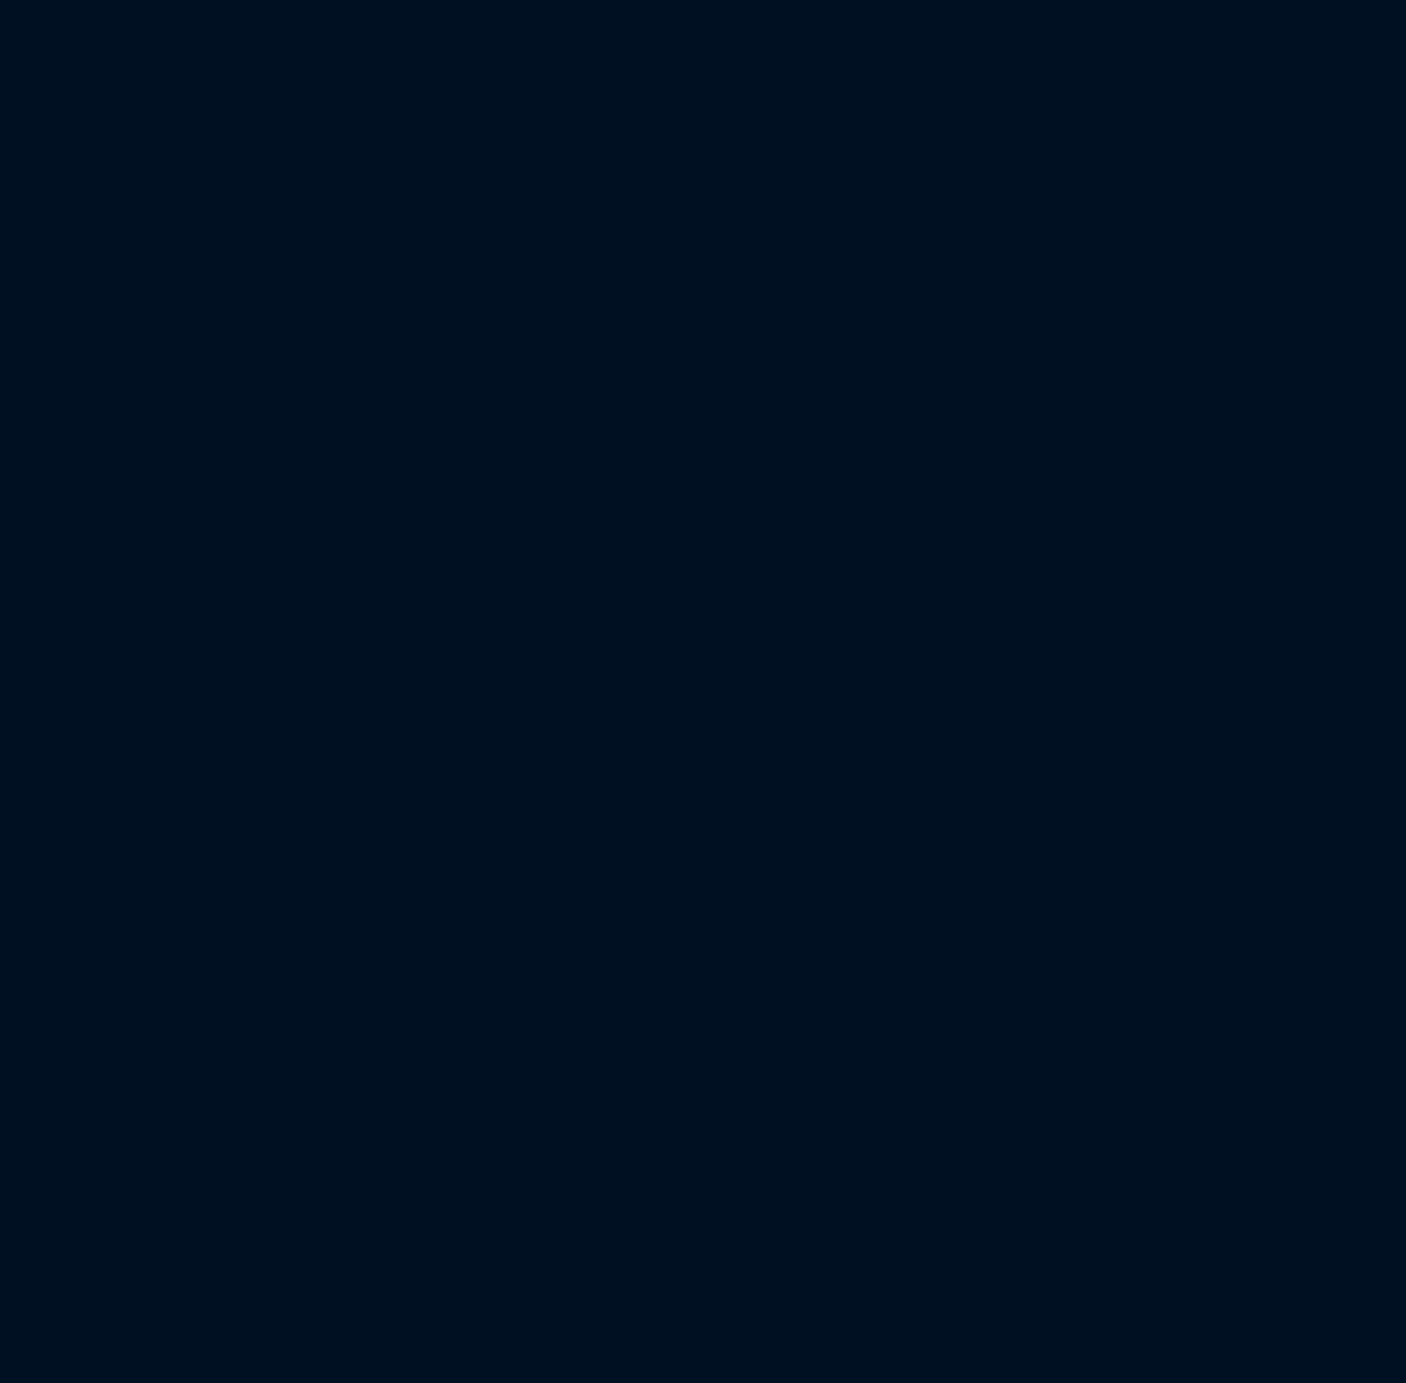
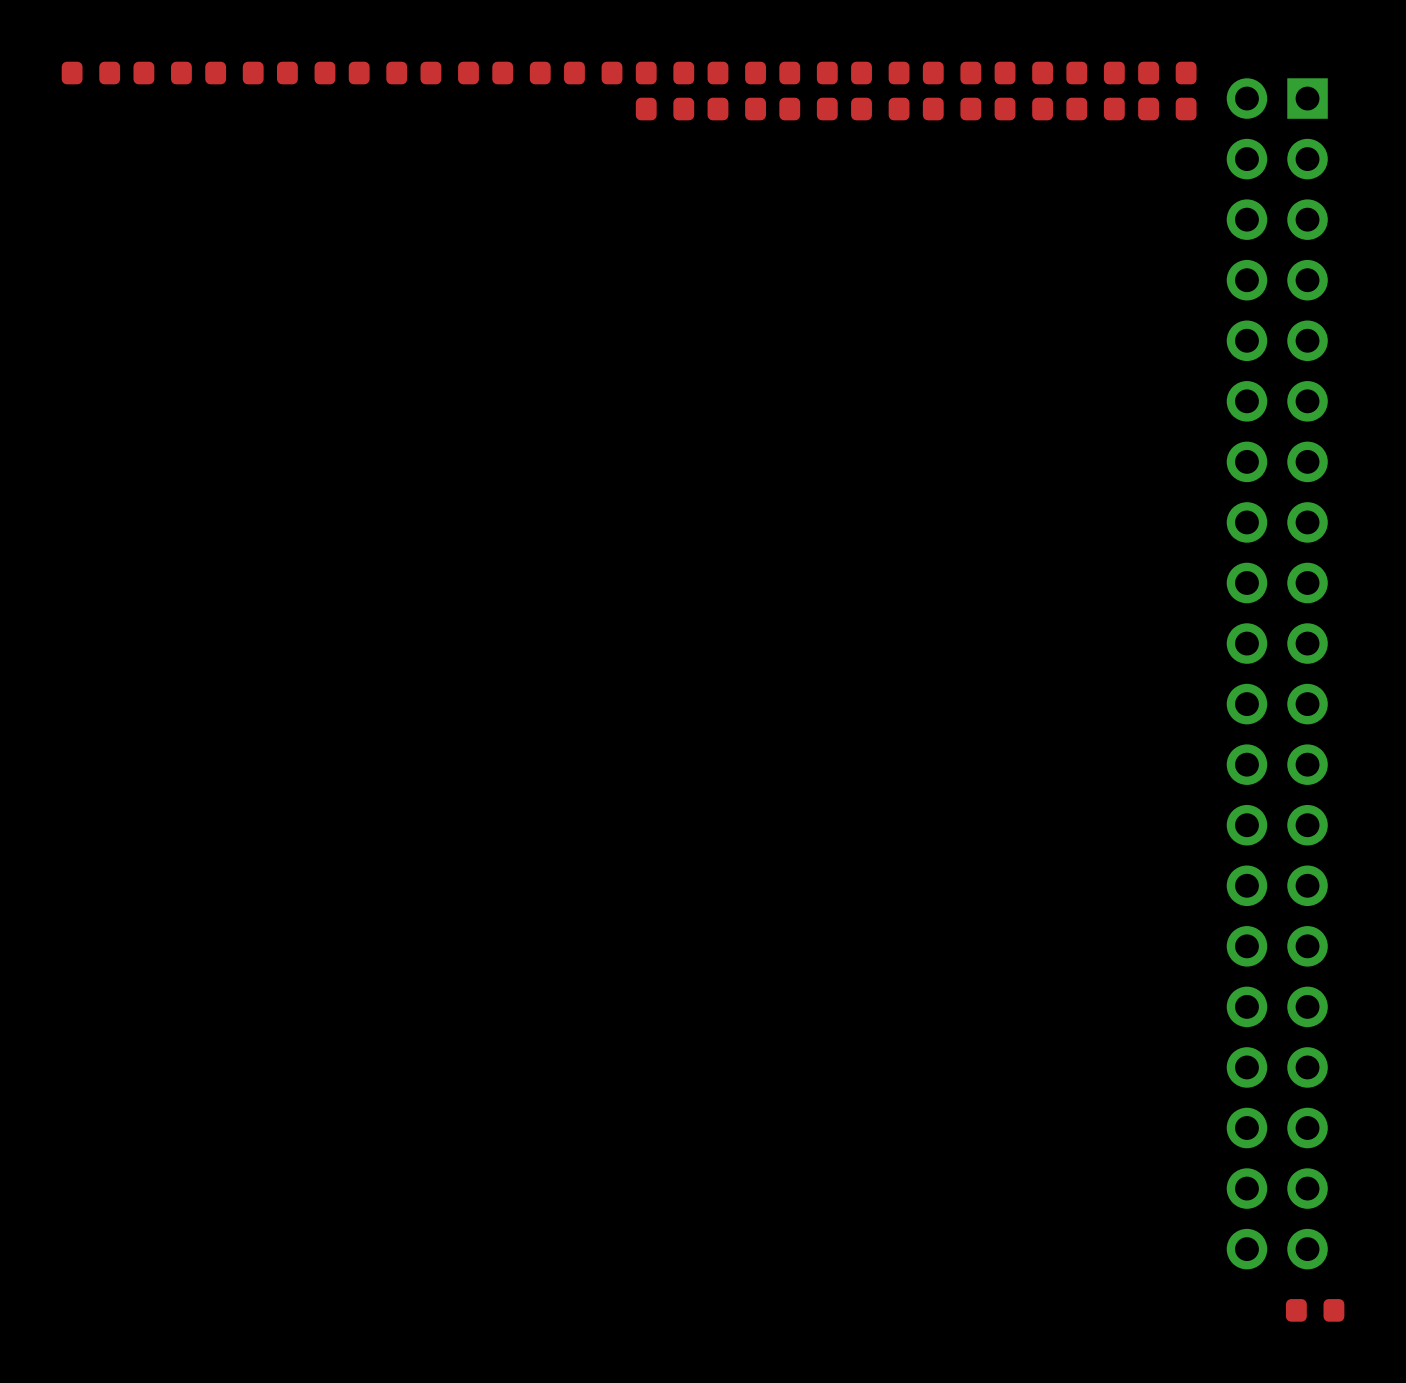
part: none -> (90, 73)
part: none -> (162, 73)
part: none -> (234, 73)
part: none -> (306, 73)
part: none -> (377, 73)
part: none -> (449, 73)
part: none -> (521, 73)
part: none -> (593, 73)
part: none -> (665, 73)
part: none -> (736, 73)
part: none -> (808, 73)
part: none -> (880, 73)
part: none -> (952, 73)
part: none -> (1023, 73)
part: none -> (1095, 73)
part: none -> (1167, 73)
part: none -> (665, 109)
part: none -> (736, 109)
part: none -> (808, 109)
part: none -> (880, 109)
part: none -> (952, 109)
part: none -> (1023, 109)
part: none -> (1095, 109)
part: none -> (1167, 109)
part: none -> (1277, 673)
part: none -> (1315, 1310)

